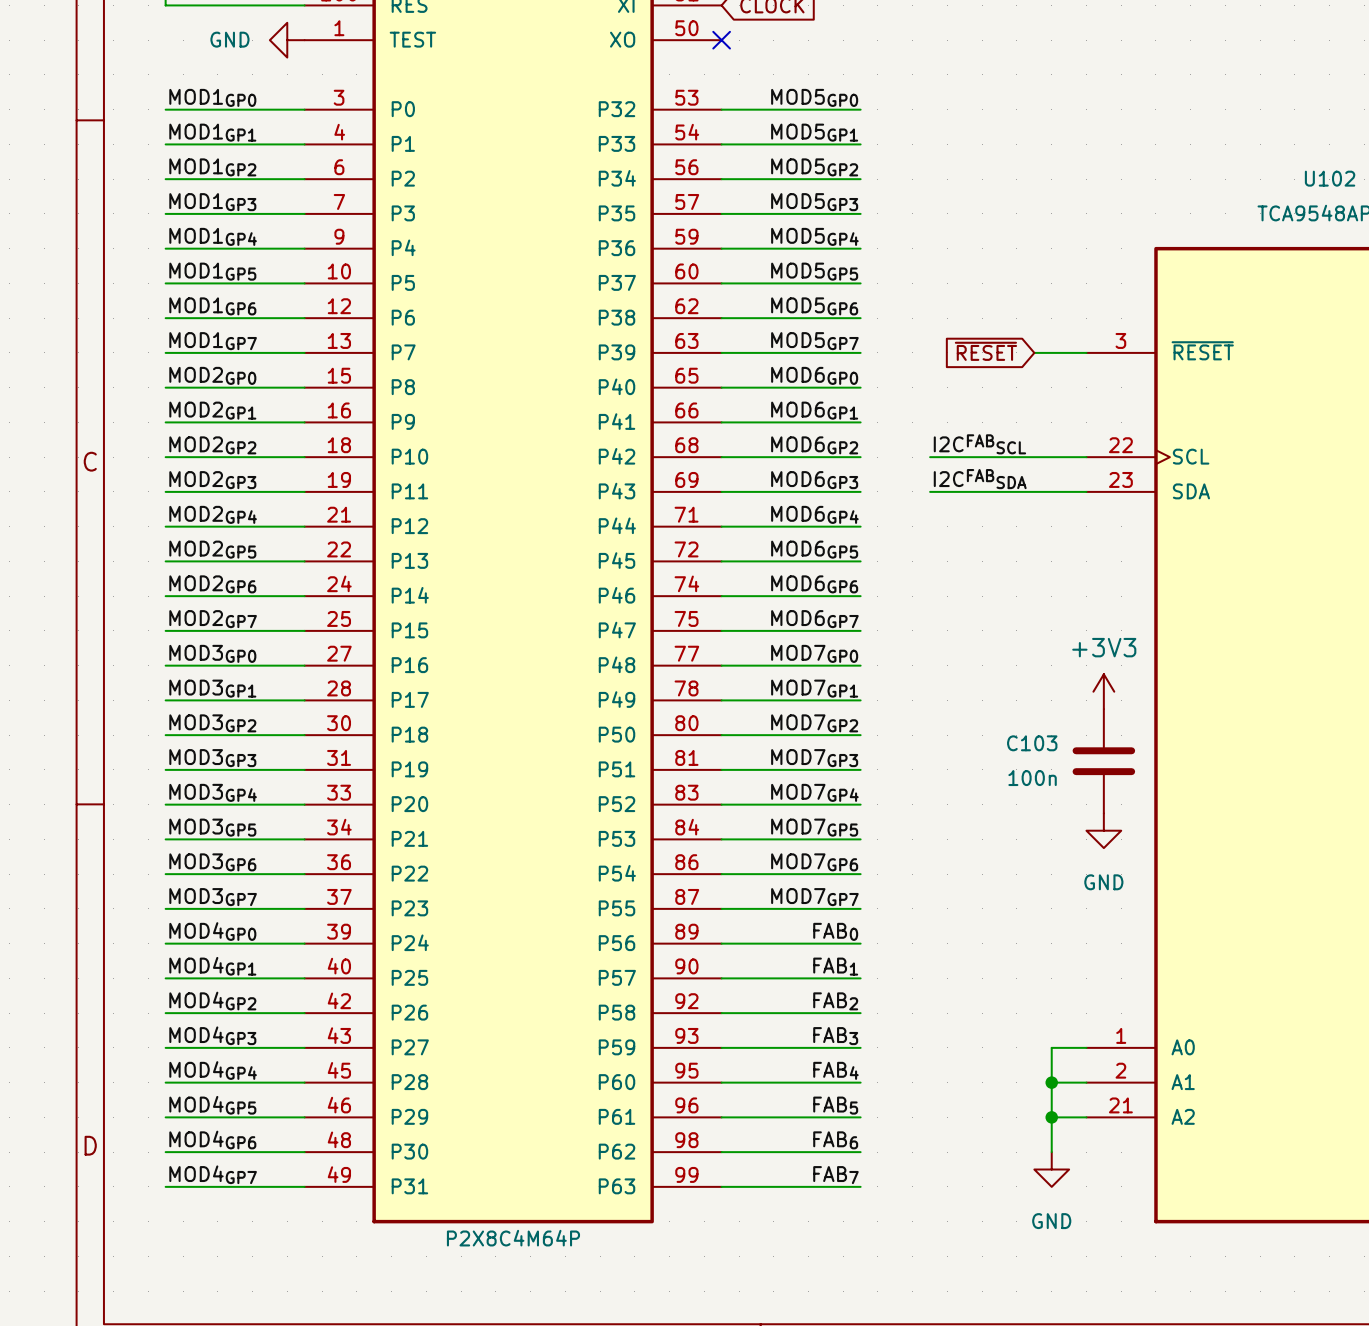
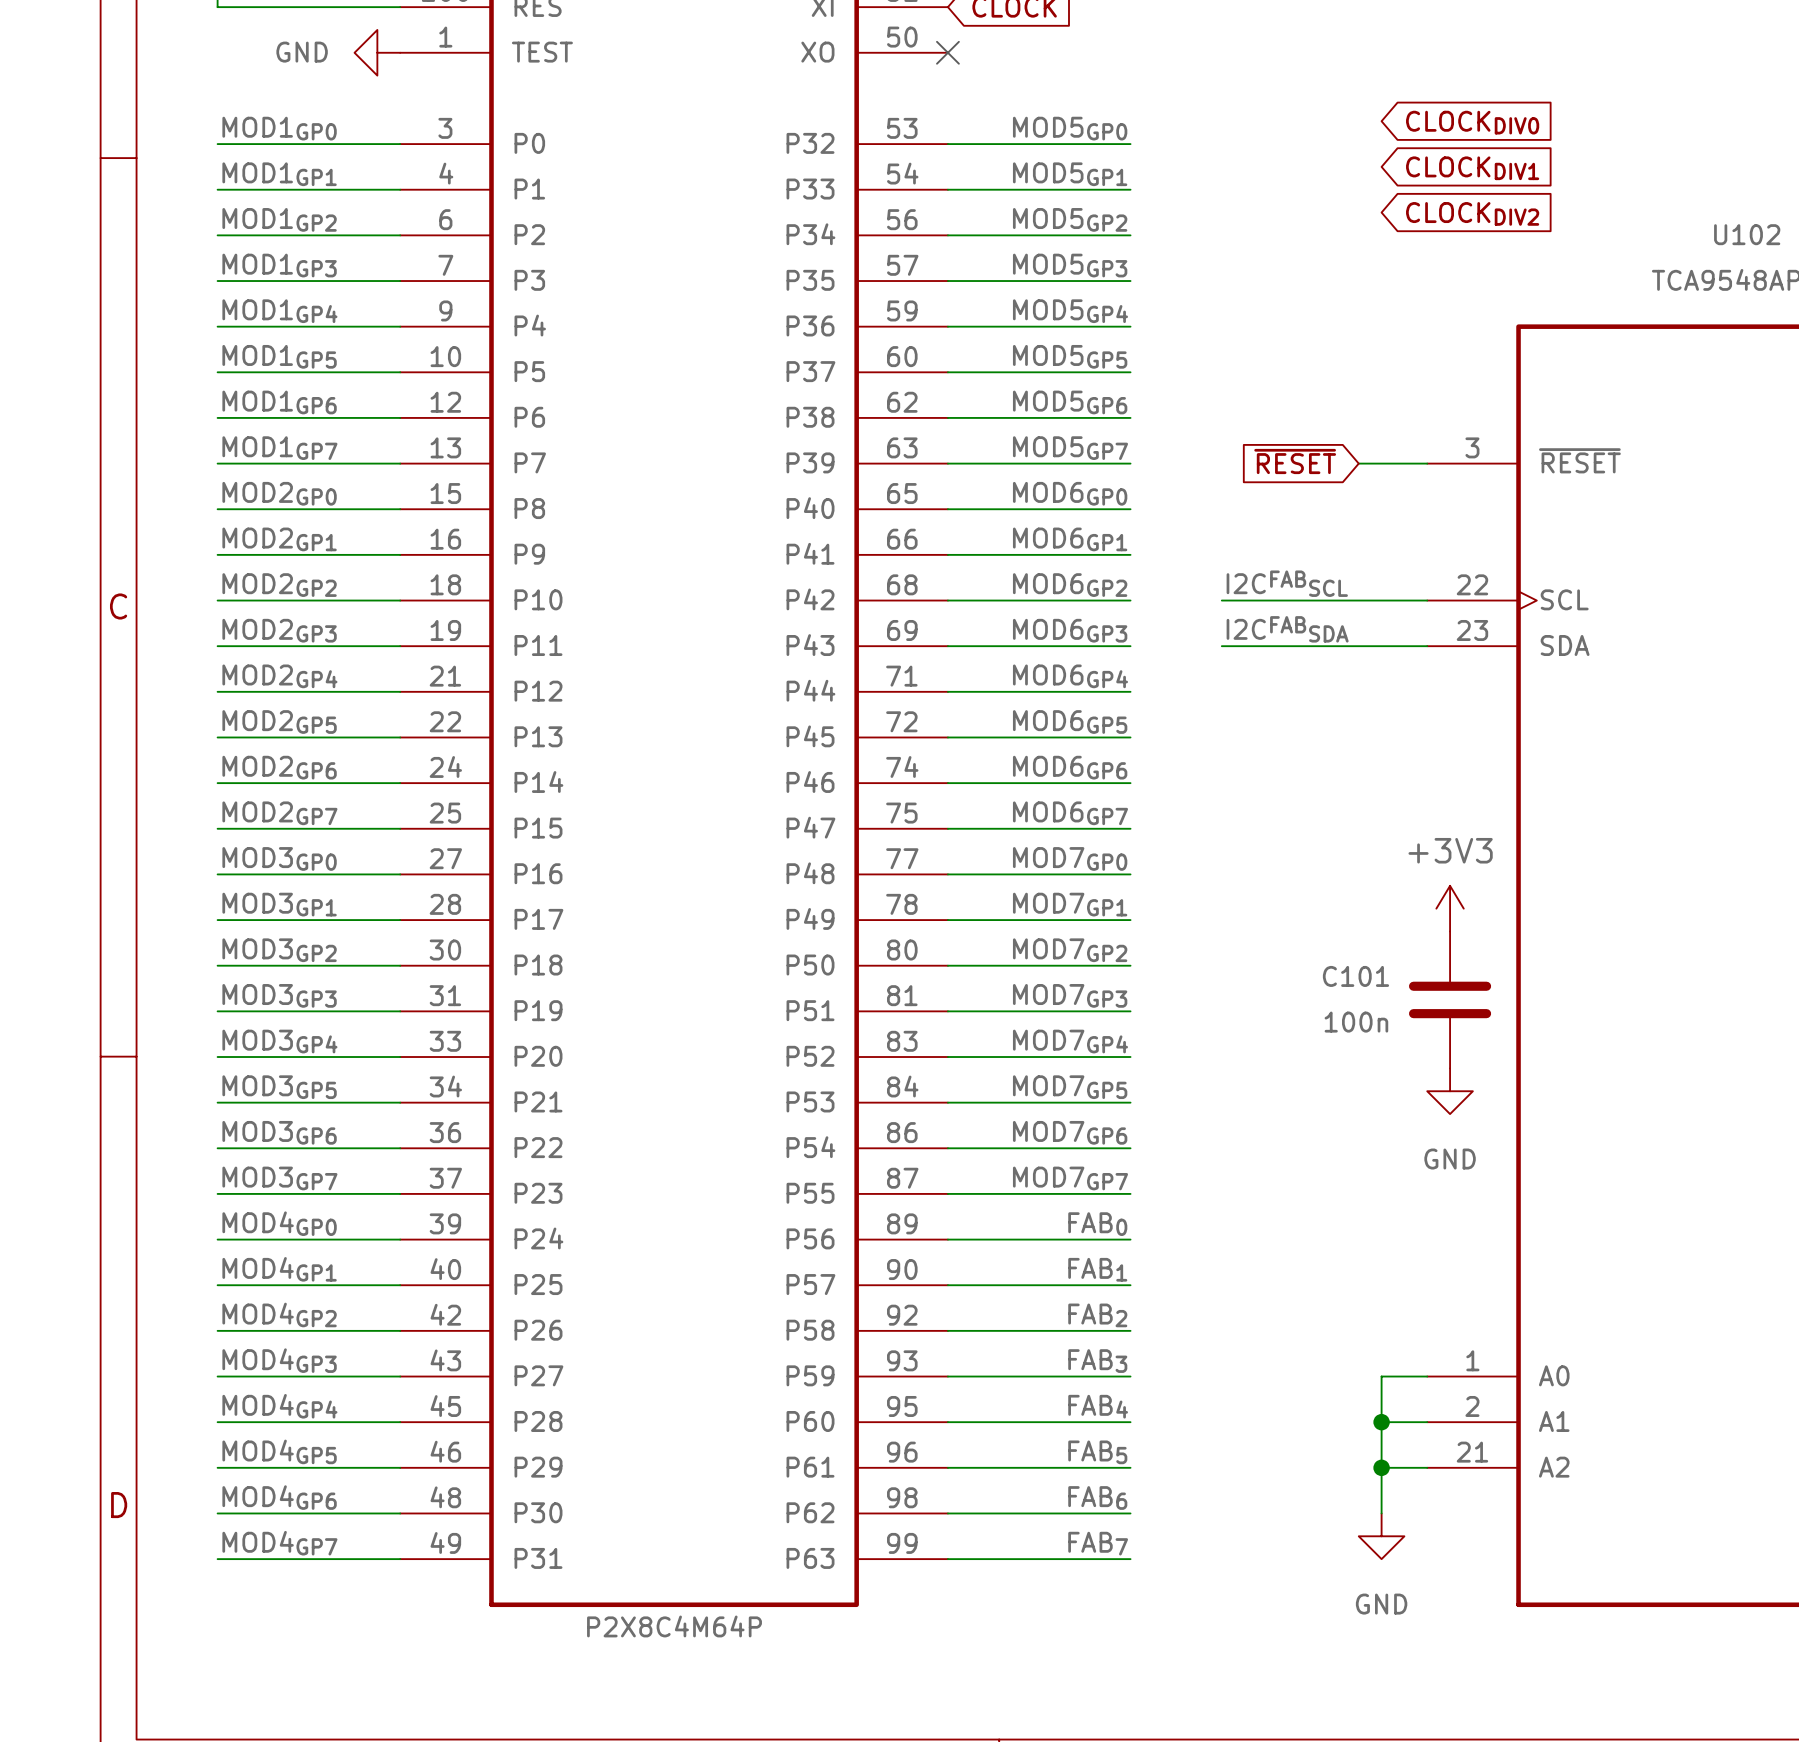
global label: none -> CLOCKDIV0 (1472, 122)
global label: none -> CLOCKDIV1 (1472, 168)
global label: none -> CLOCKDIV2 (1472, 213)
C103 name: C103 (1032, 743) -> C101 (1355, 976)

